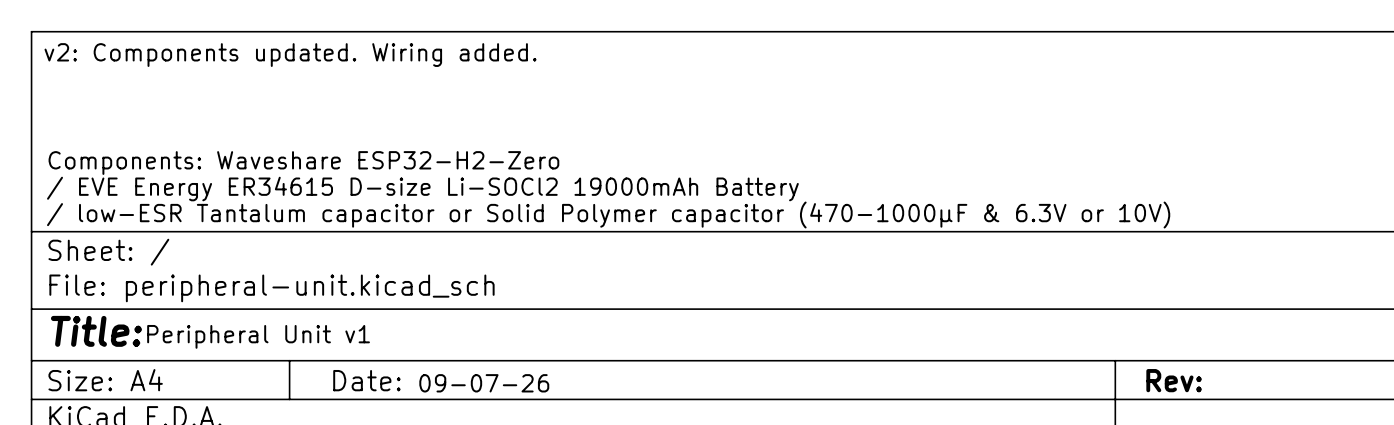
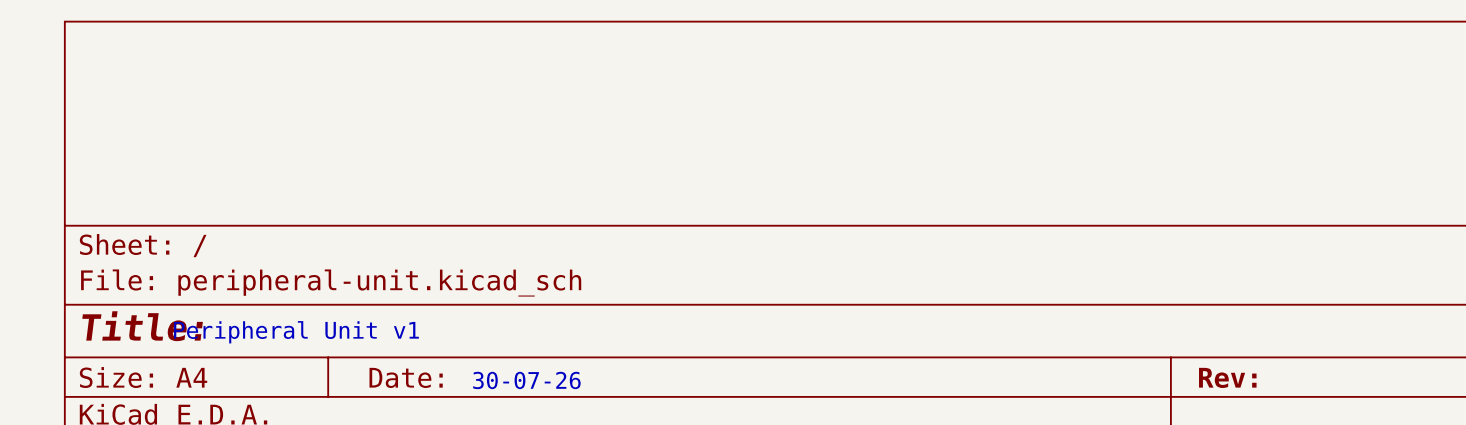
text: v2: Components updated. Wiring added. (290, 55) -> none
text: Components: Waveshare ESP32-H2-Zero (303, 163) -> none
text: / EVE Energy ER34615 D-size Li-SOCl2 19000mAh Battery (422, 189) -> none
text: / low-ESR Tantalum capacitor or Solid Polymer capacitor (470-1000μF & 6.3V or 10V) (608, 215) -> none
text: 09-07-26 (484, 383) -> 30-07-26 (526, 380)

